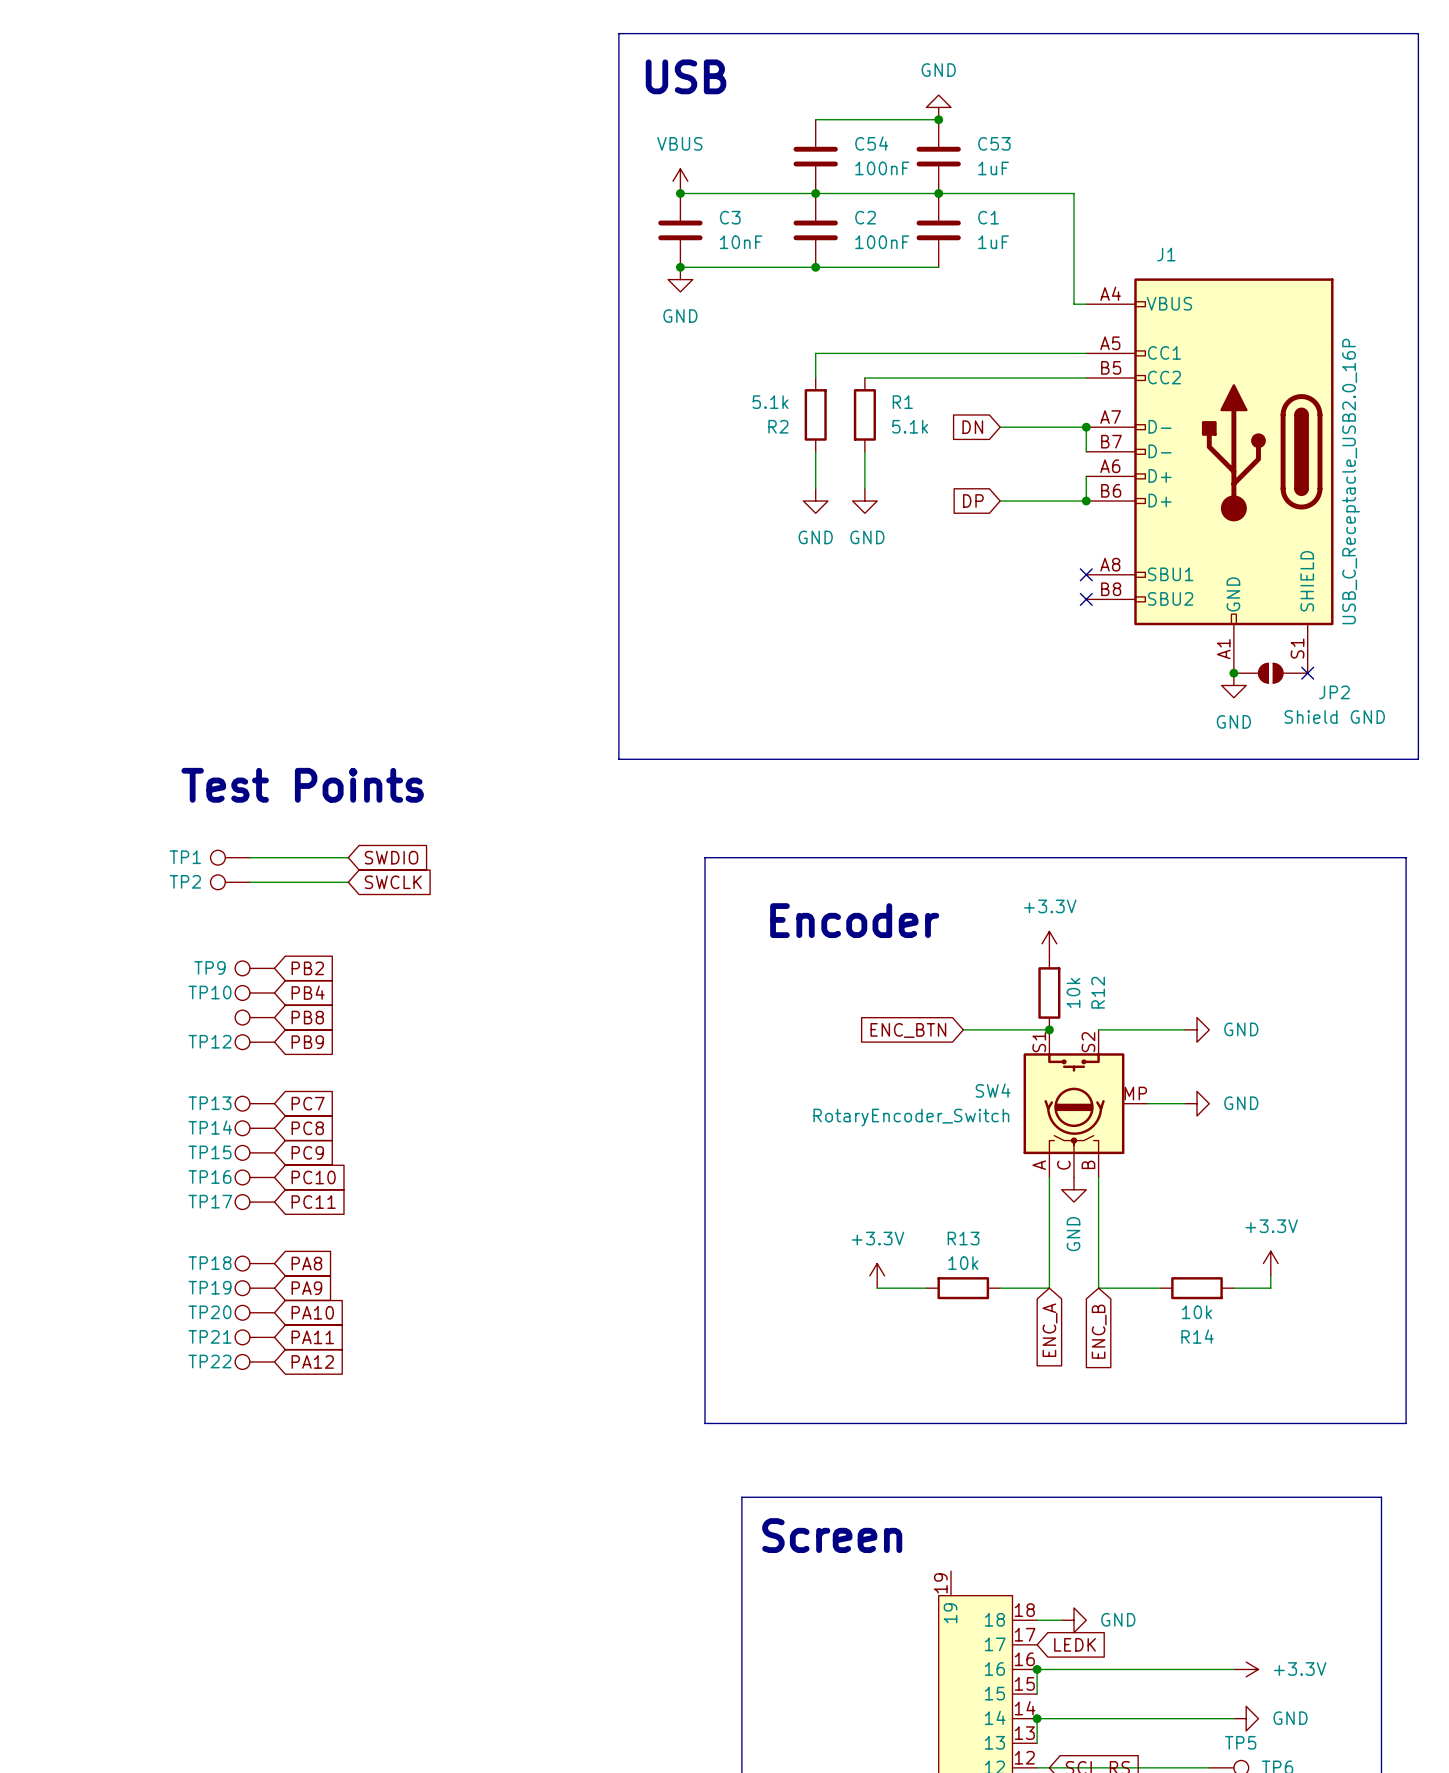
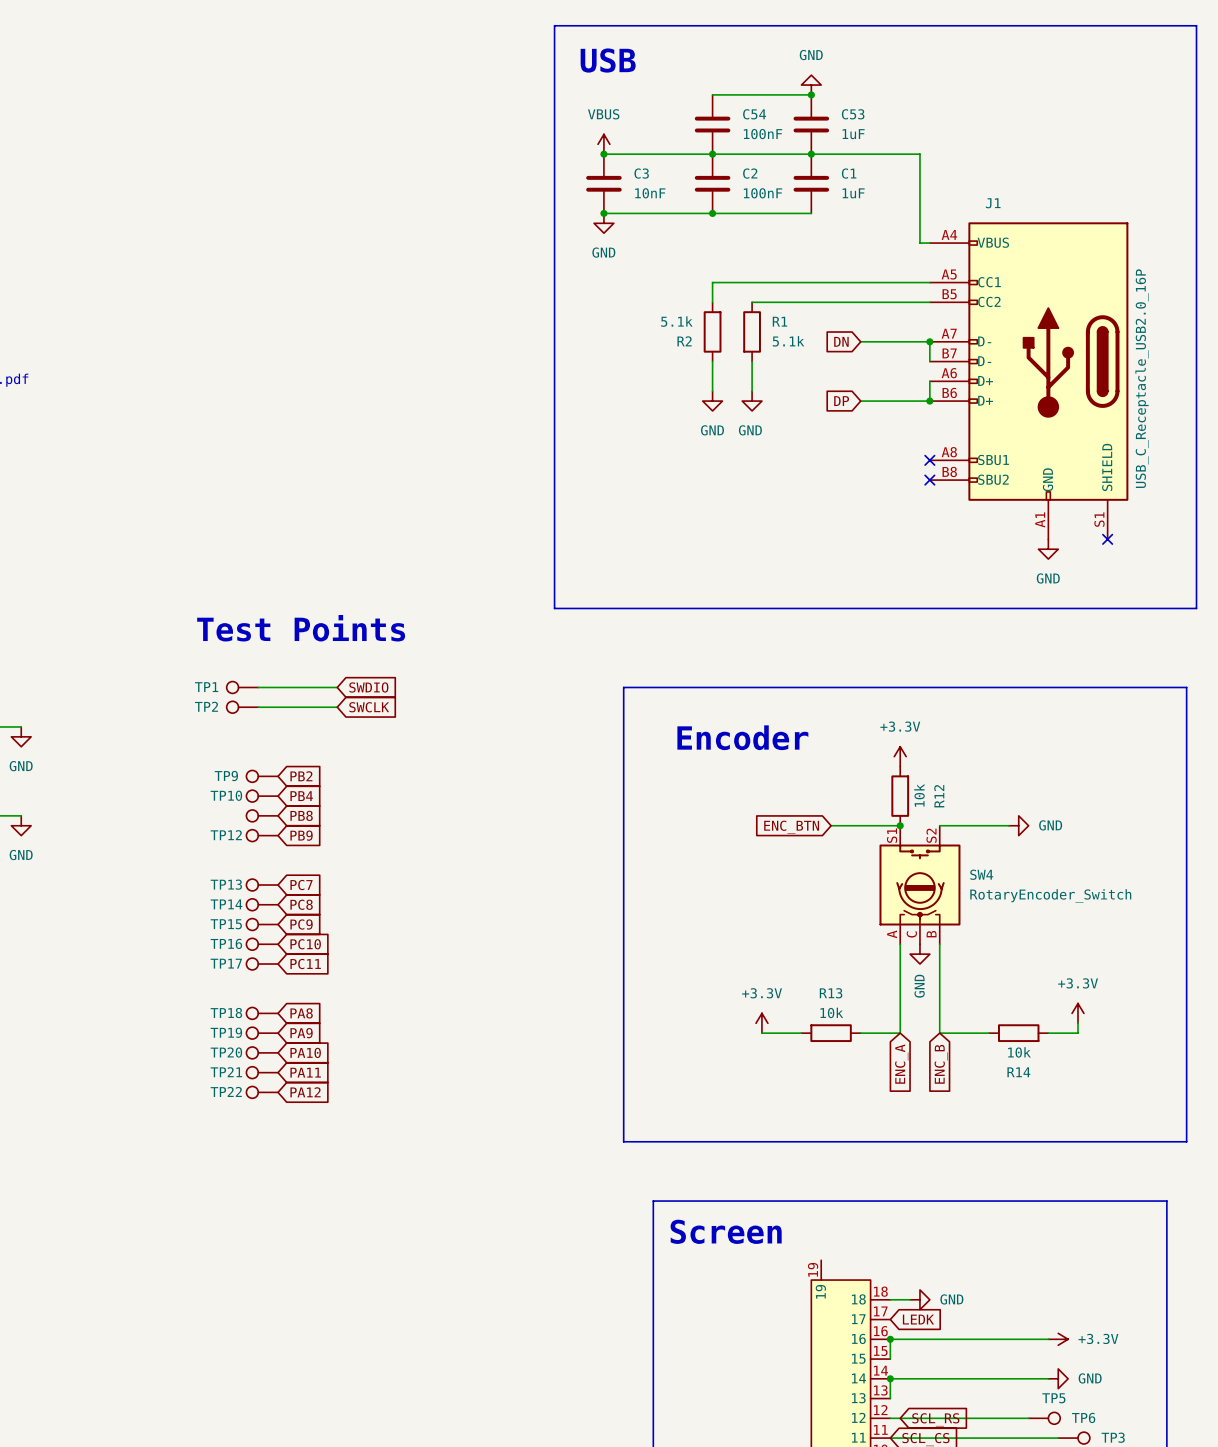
junction: (1233, 673) -> none
JP2: Shield GND (1270, 673) -> none
SW4 symbol: [1023, 1029, 1148, 1178] -> [879, 825, 961, 945]
SW4 name position: SW4 (993, 1090) -> SW4 (981, 874)
wire: (1147, 1103) (1184, 1103) -> none
power symbol: GND (1196, 1103) -> none
SW4 value position: RotaryEncoder_Switch (911, 1117) -> RotaryEncoder_Switch (1050, 895)

